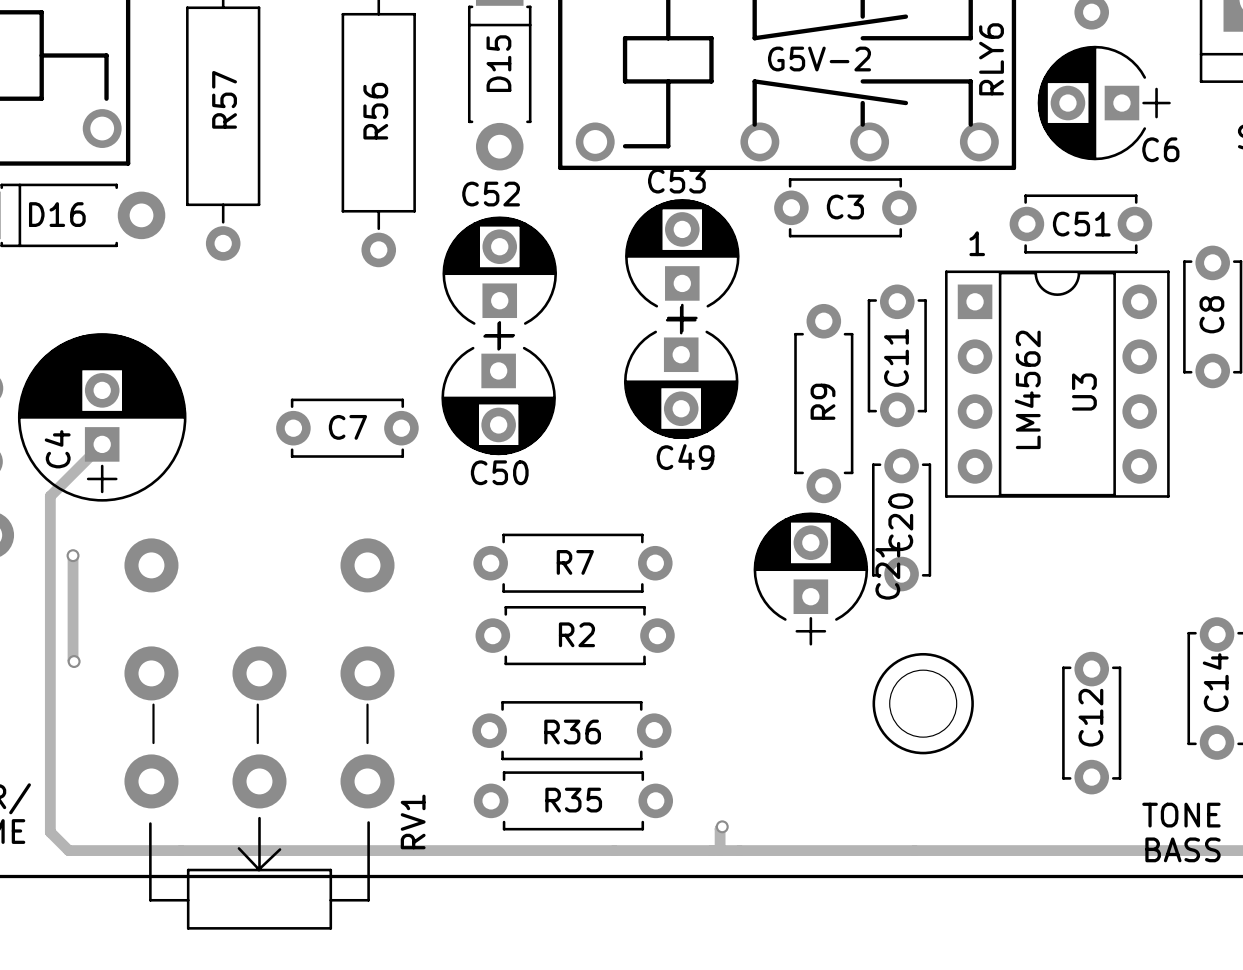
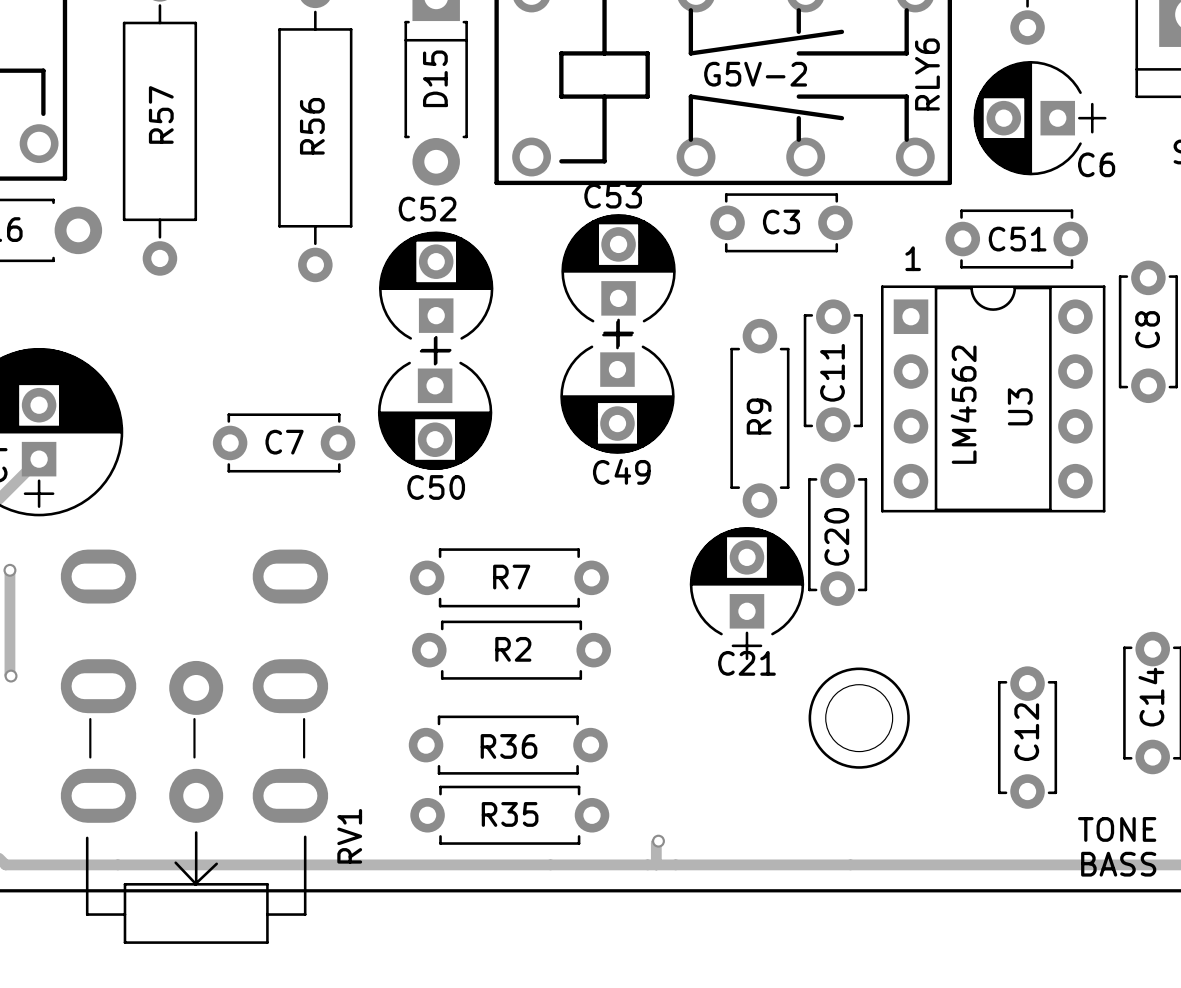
RV1 footprint: [124, 538, 395, 930] -> [60, 549, 329, 944]
C21 name rotation: 0° (887, 570) -> 90° clockwise (746, 663)
C21 name position: C21 (887, 570) -> C21 (746, 663)

